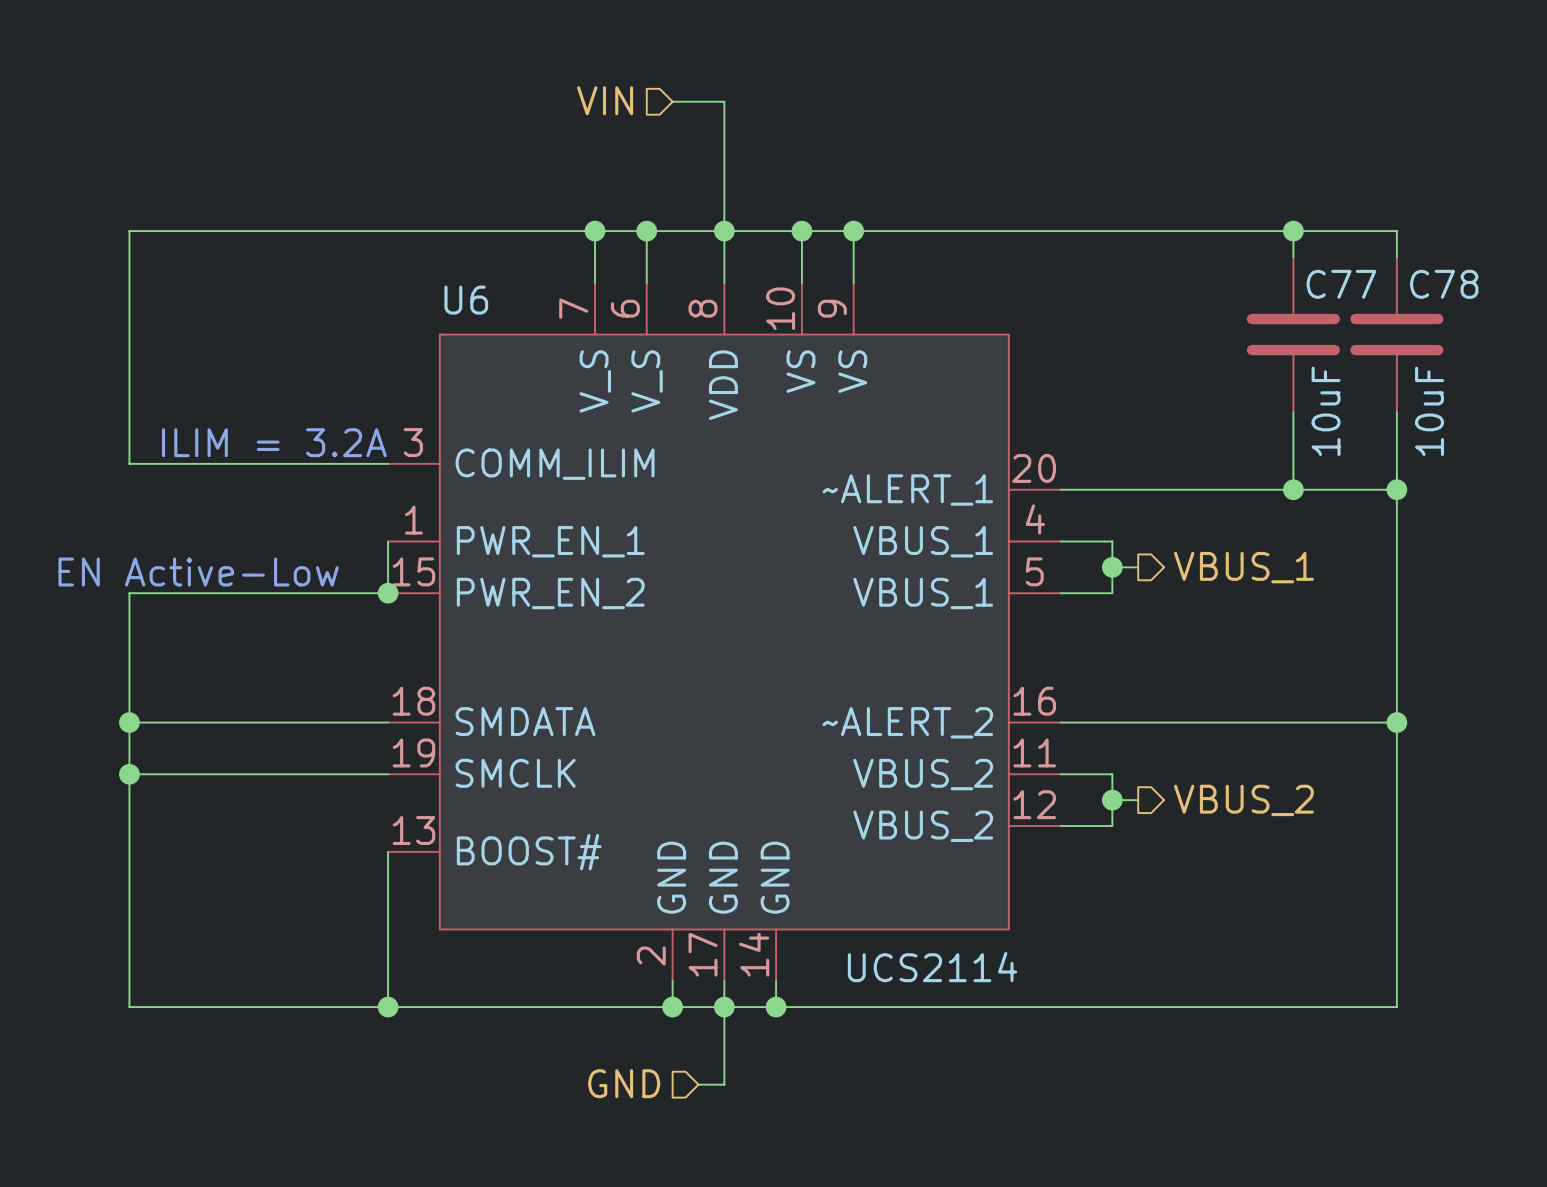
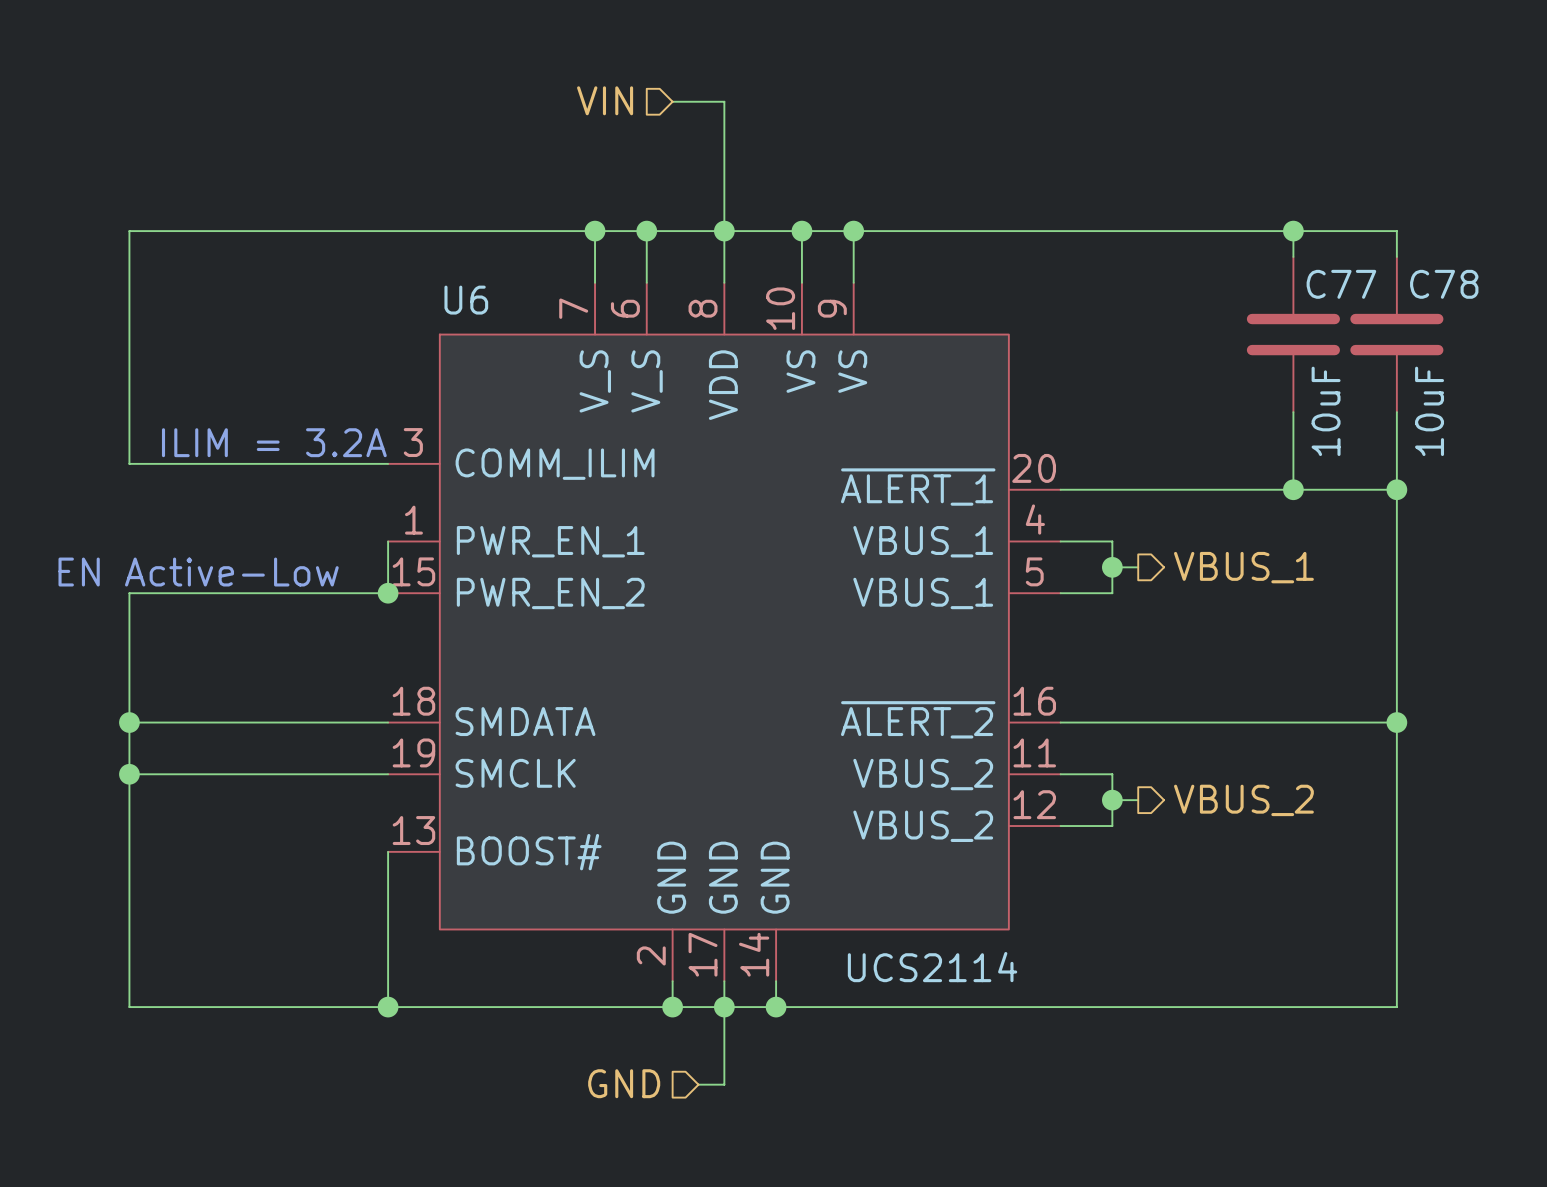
U6 pin name: ~ALERT_1 (907, 490) -> ~{ALERT_1} (918, 487)
U6 pin name: ~ALERT_2 (907, 722) -> ~{ALERT_2} (918, 719)

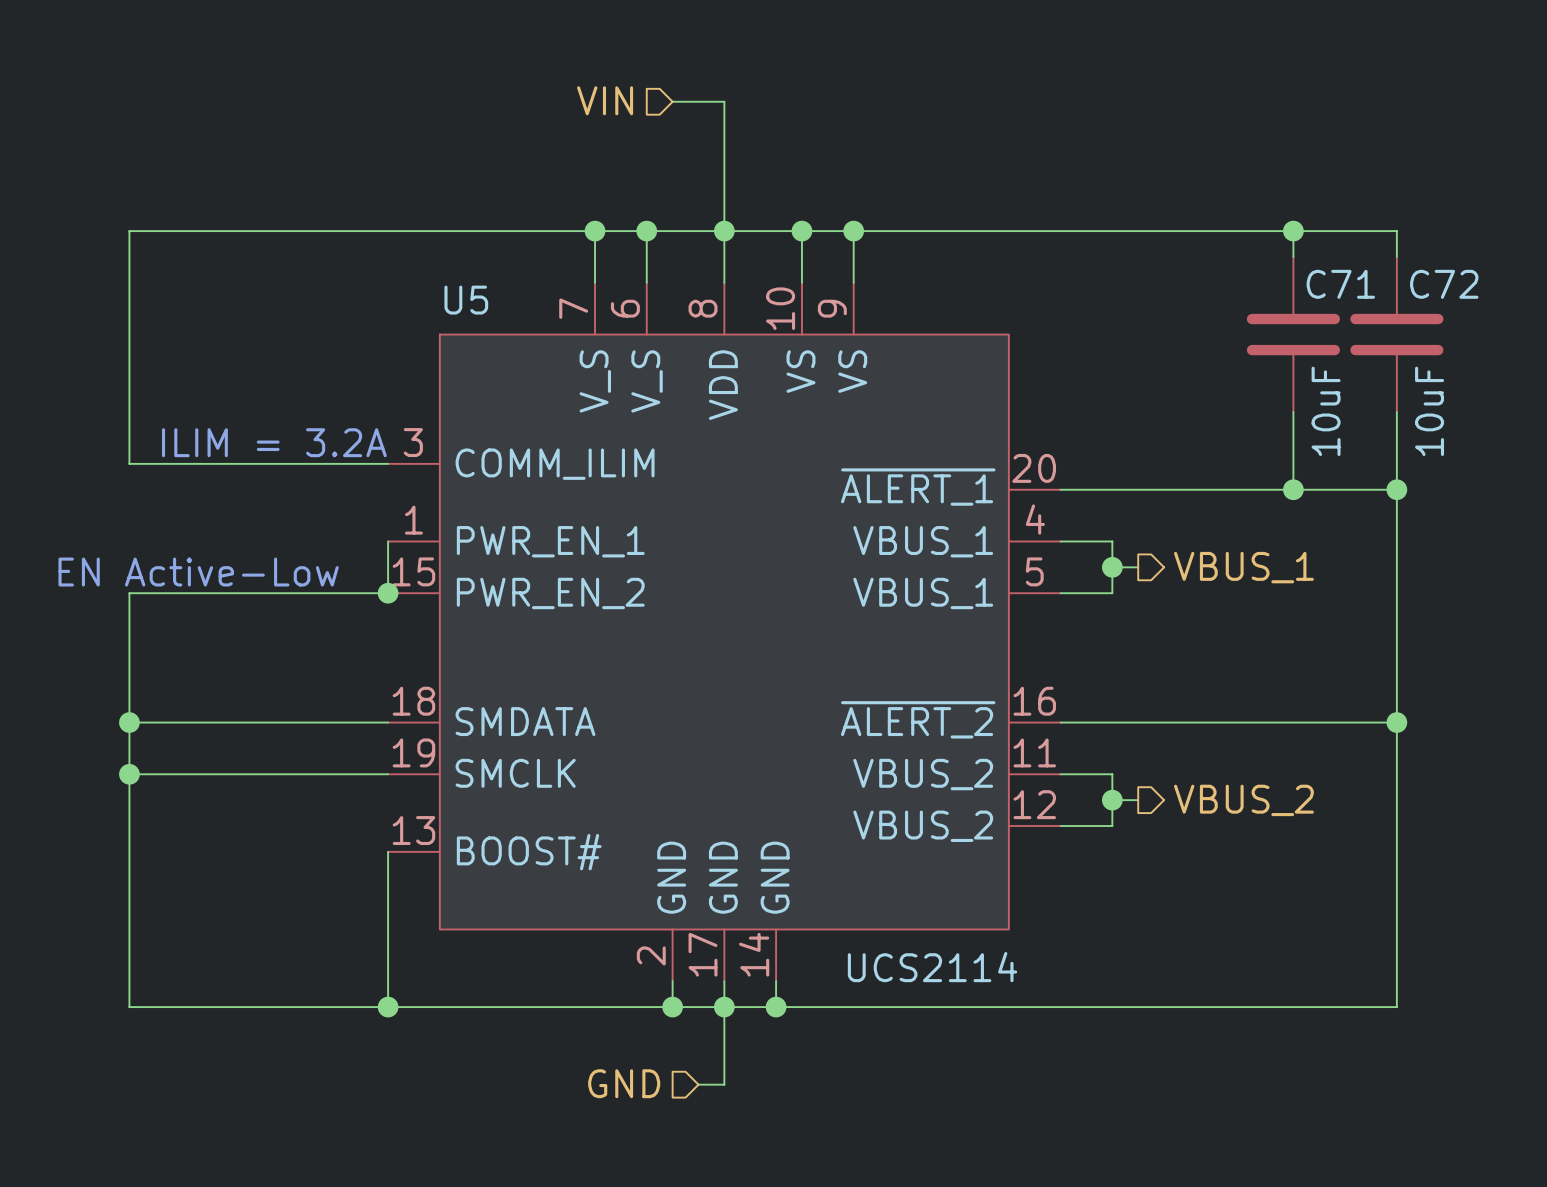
C77 name: C77 (1341, 284) -> C71 (1340, 284)
C78 name: C78 (1444, 284) -> C72 (1444, 284)
U6 name: U6 (466, 300) -> U5 (466, 300)

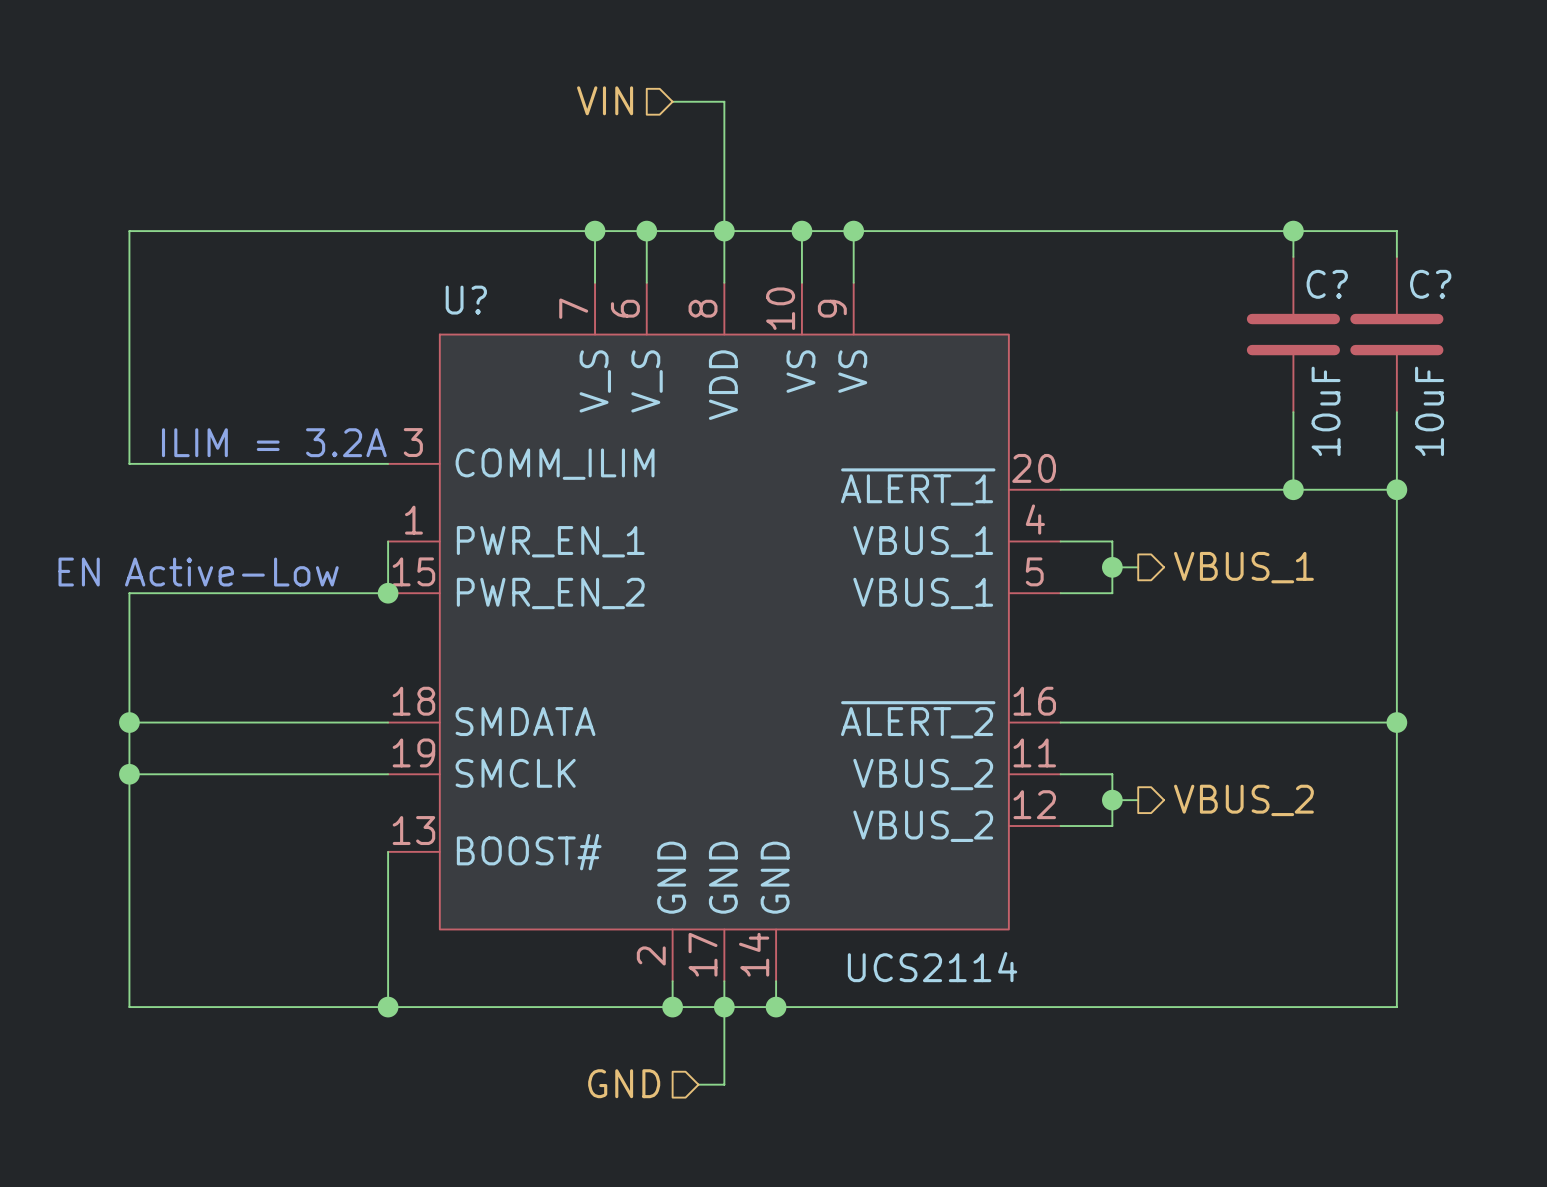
C71 name: C71 (1340, 284) -> C? (1327, 284)
C72 name: C72 (1444, 284) -> C? (1430, 284)
U5 name: U5 (466, 300) -> U? (466, 300)

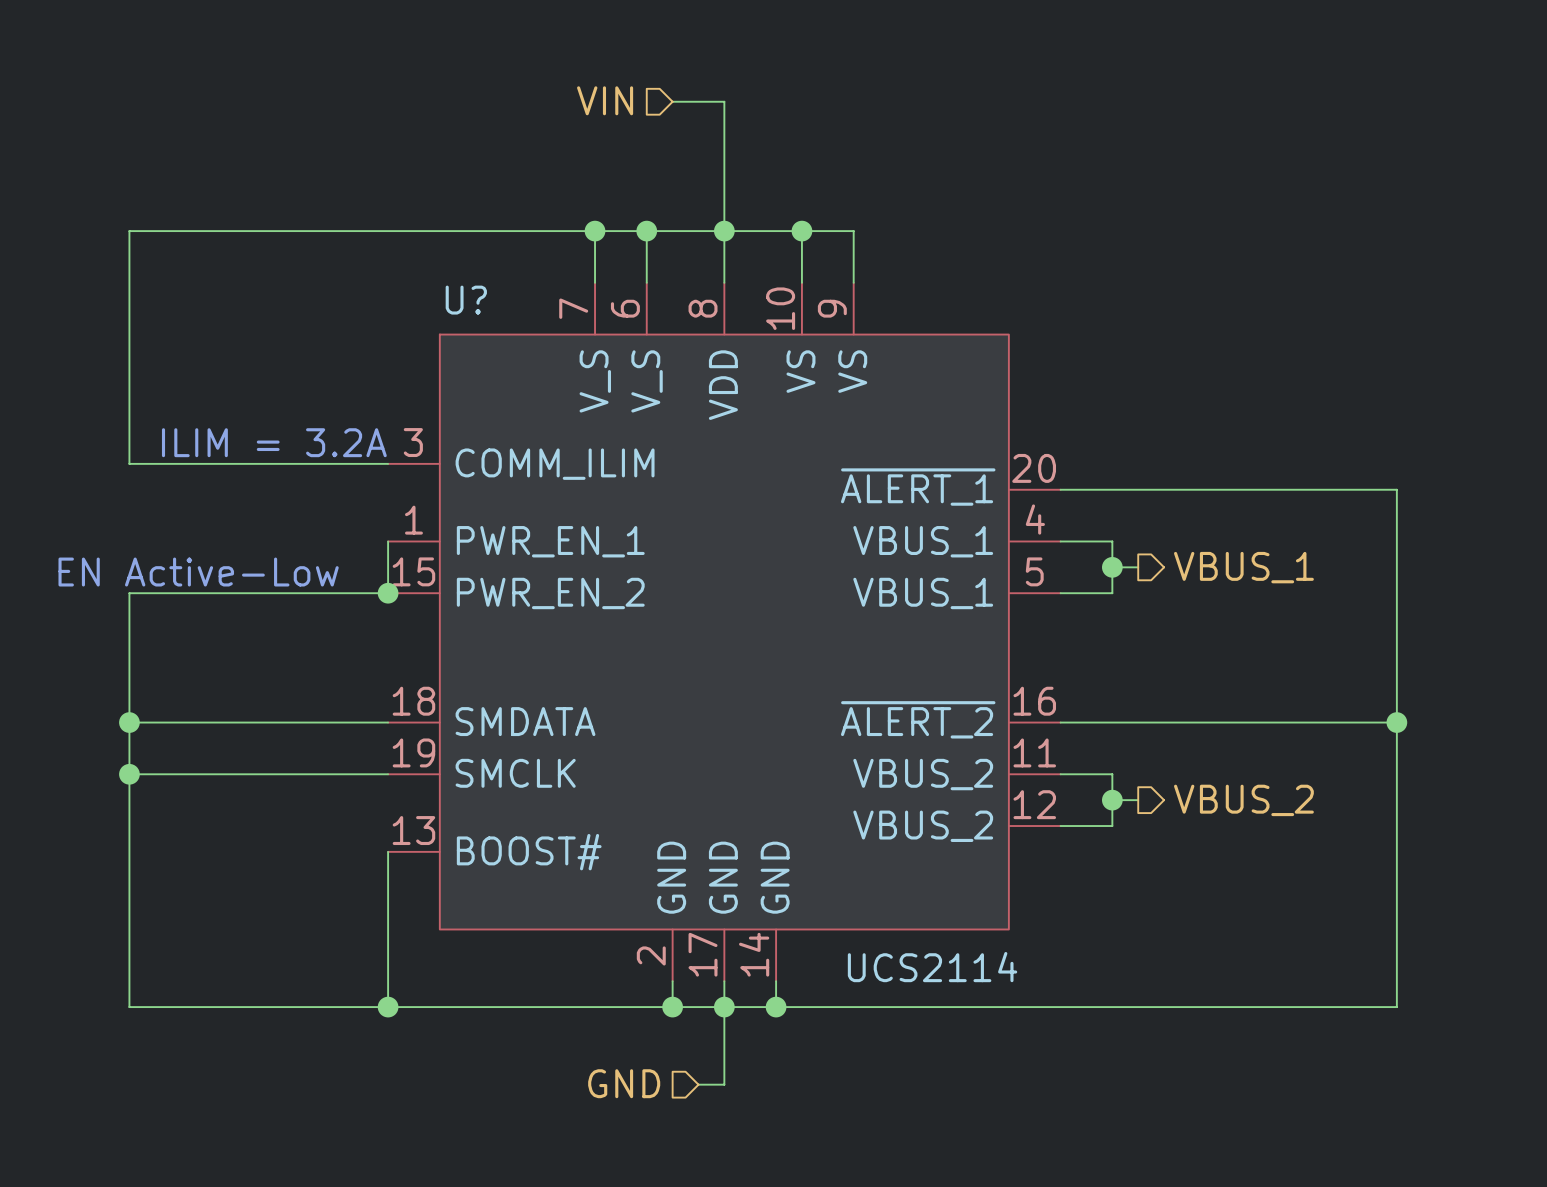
wire: (853, 231) (1396, 231) (1396, 256) -> none
junction: (853, 231) -> none
wire: (1293, 231) (1293, 256) -> none
junction: (1293, 231) -> none
C?: (1293, 334) -> none
C?: (1396, 334) -> none
wire: (1293, 412) (1293, 489) -> none
wire: (1396, 412) (1396, 489) -> none
junction: (1293, 489) -> none
junction: (1396, 489) -> none

